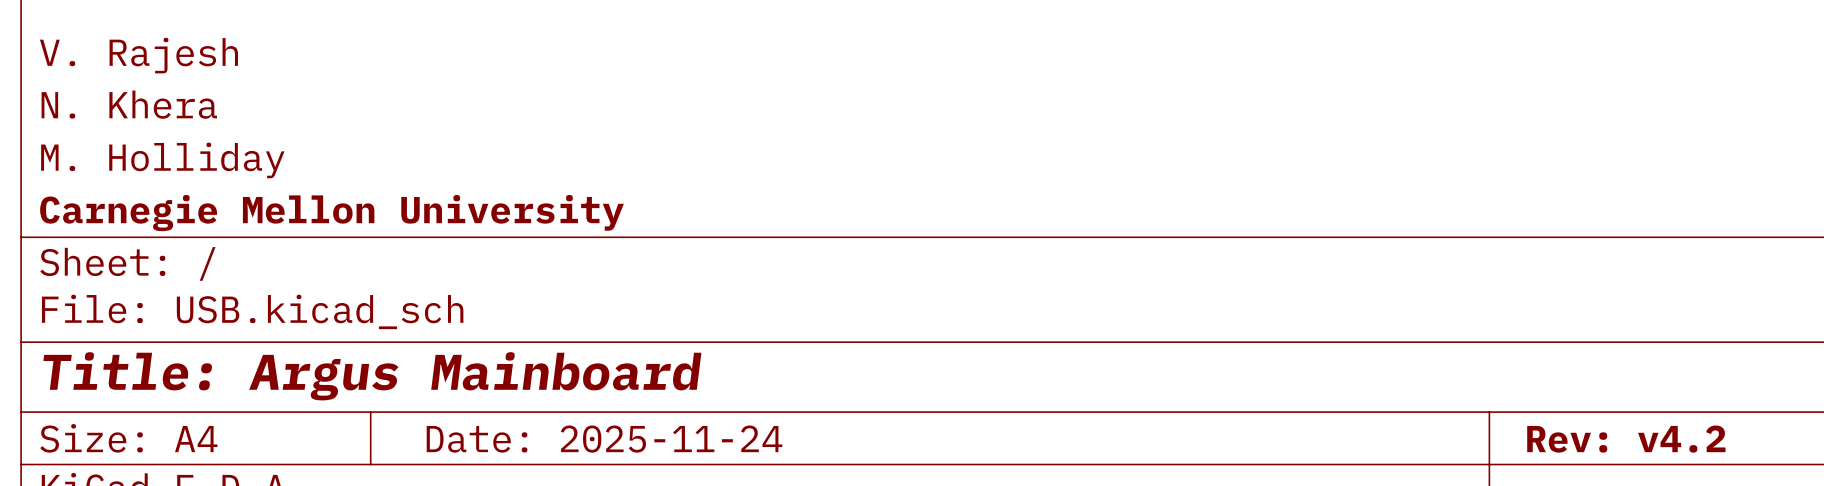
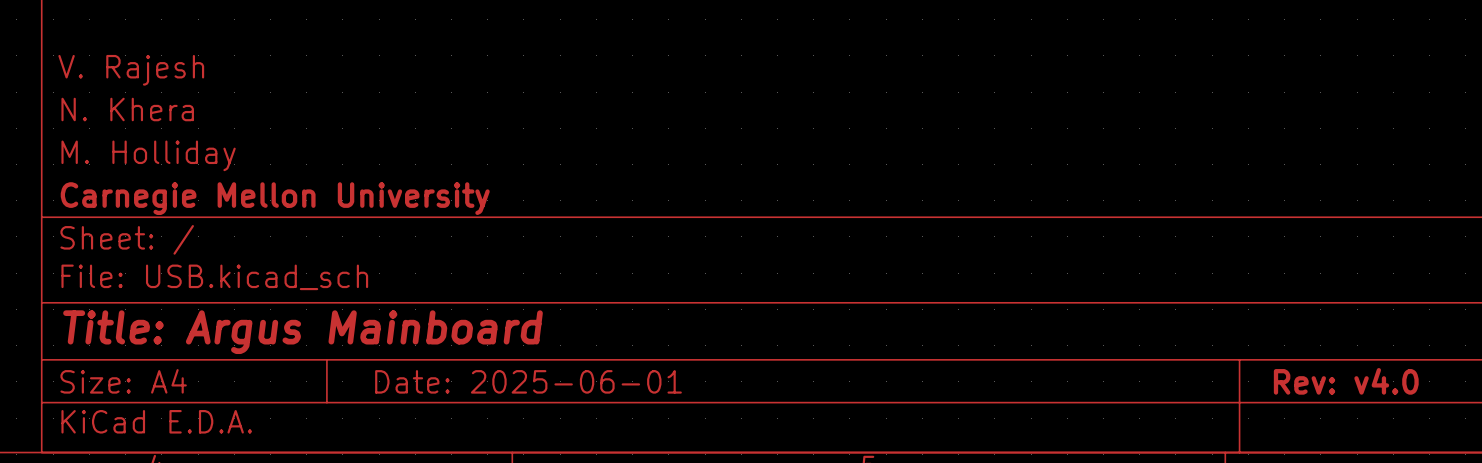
title block: Date: 2025-11-24 (604, 439) -> Date: 2025-06-01 (528, 381)
title block: Rev: v4.2 (1626, 439) -> Rev: v4.0 (1346, 381)

